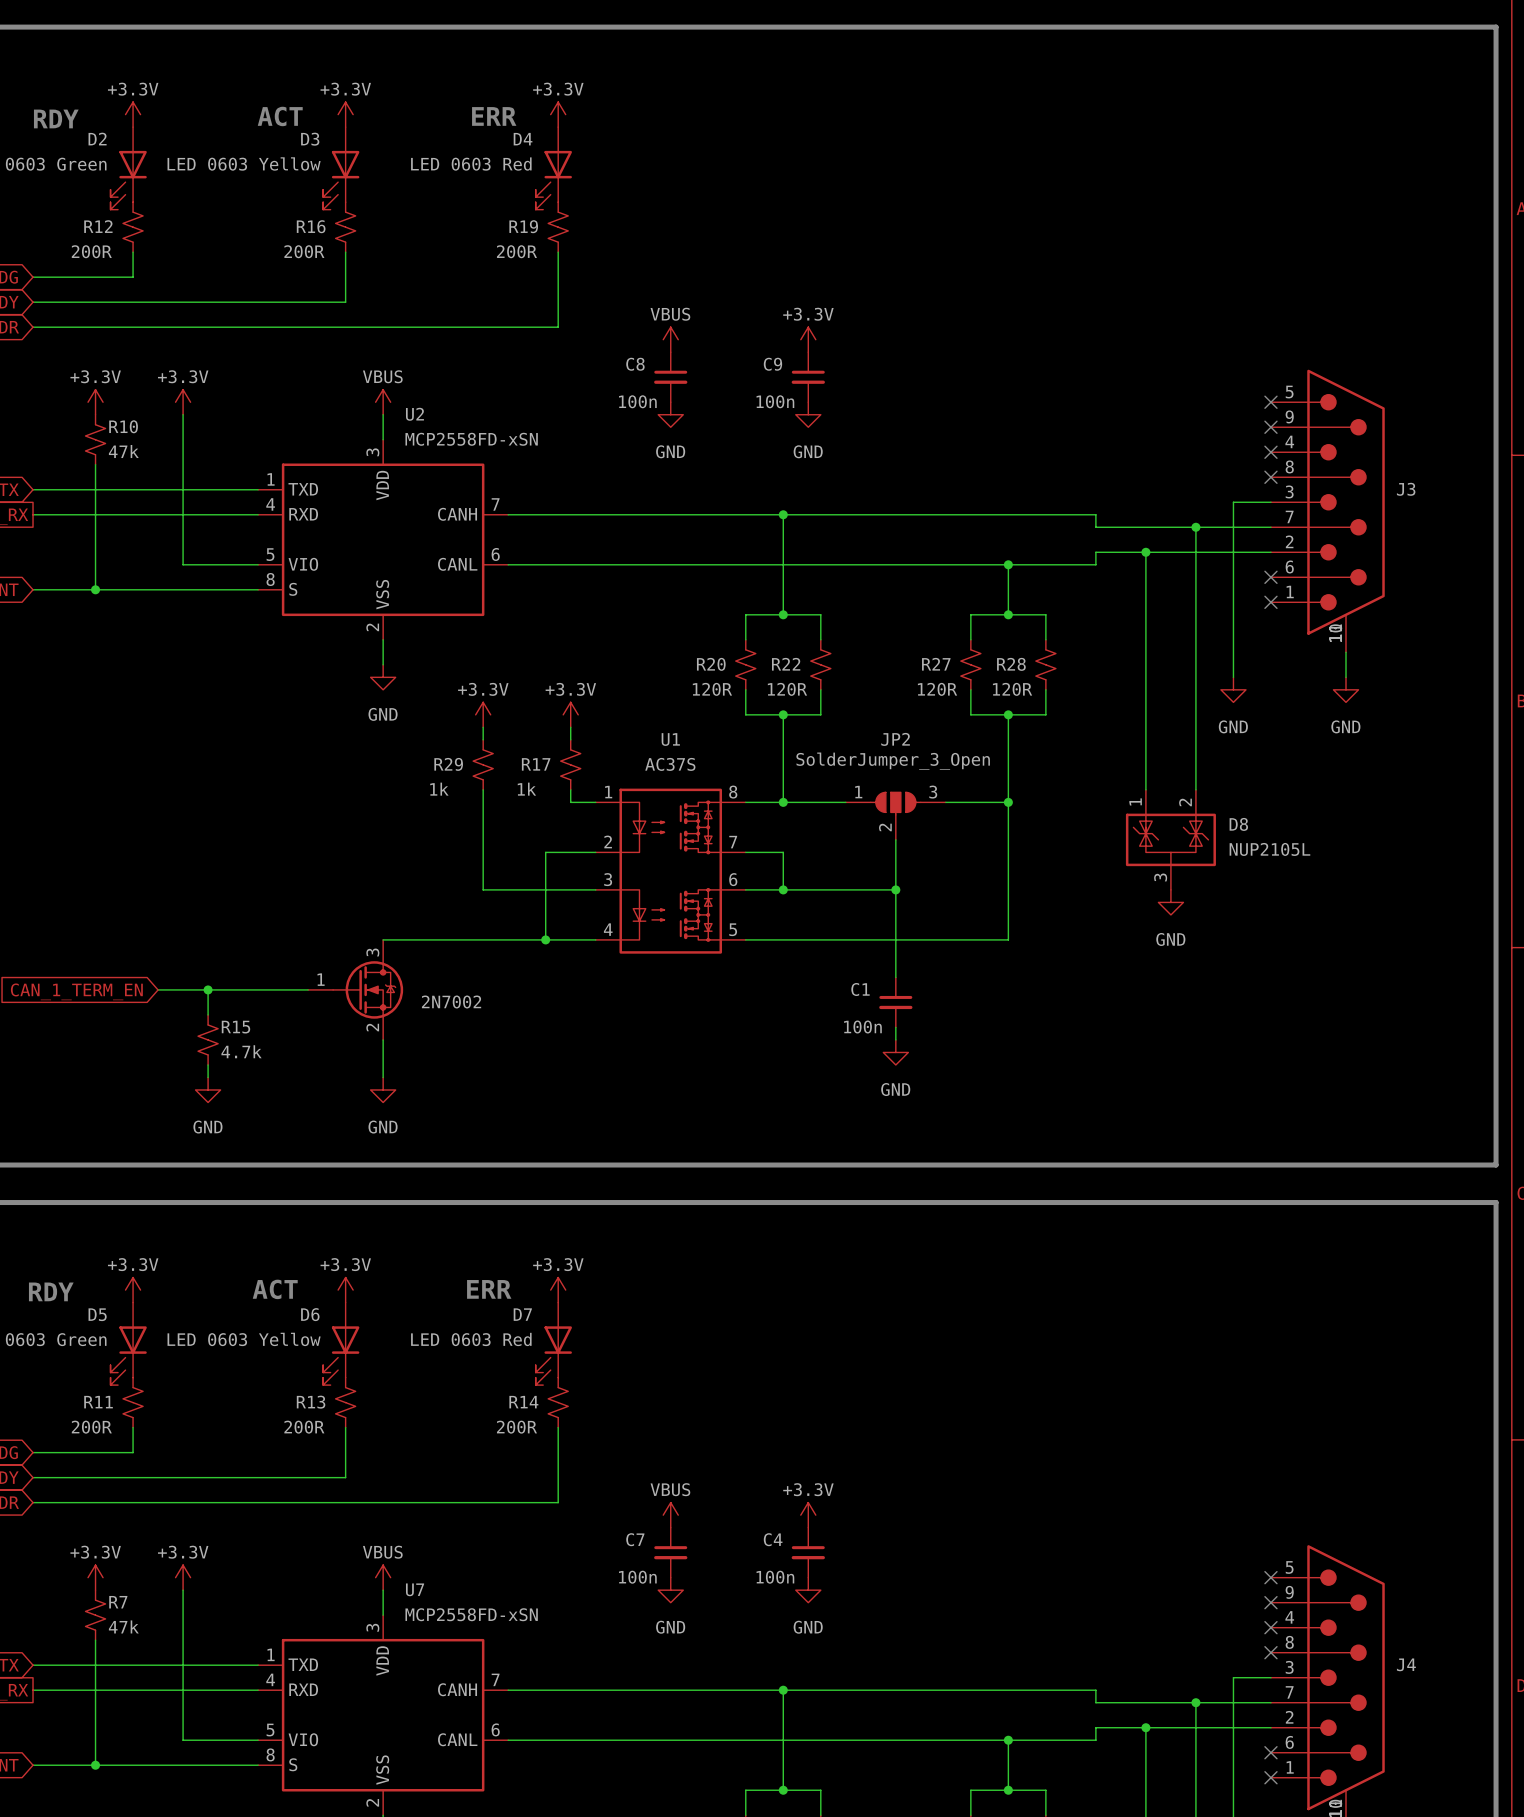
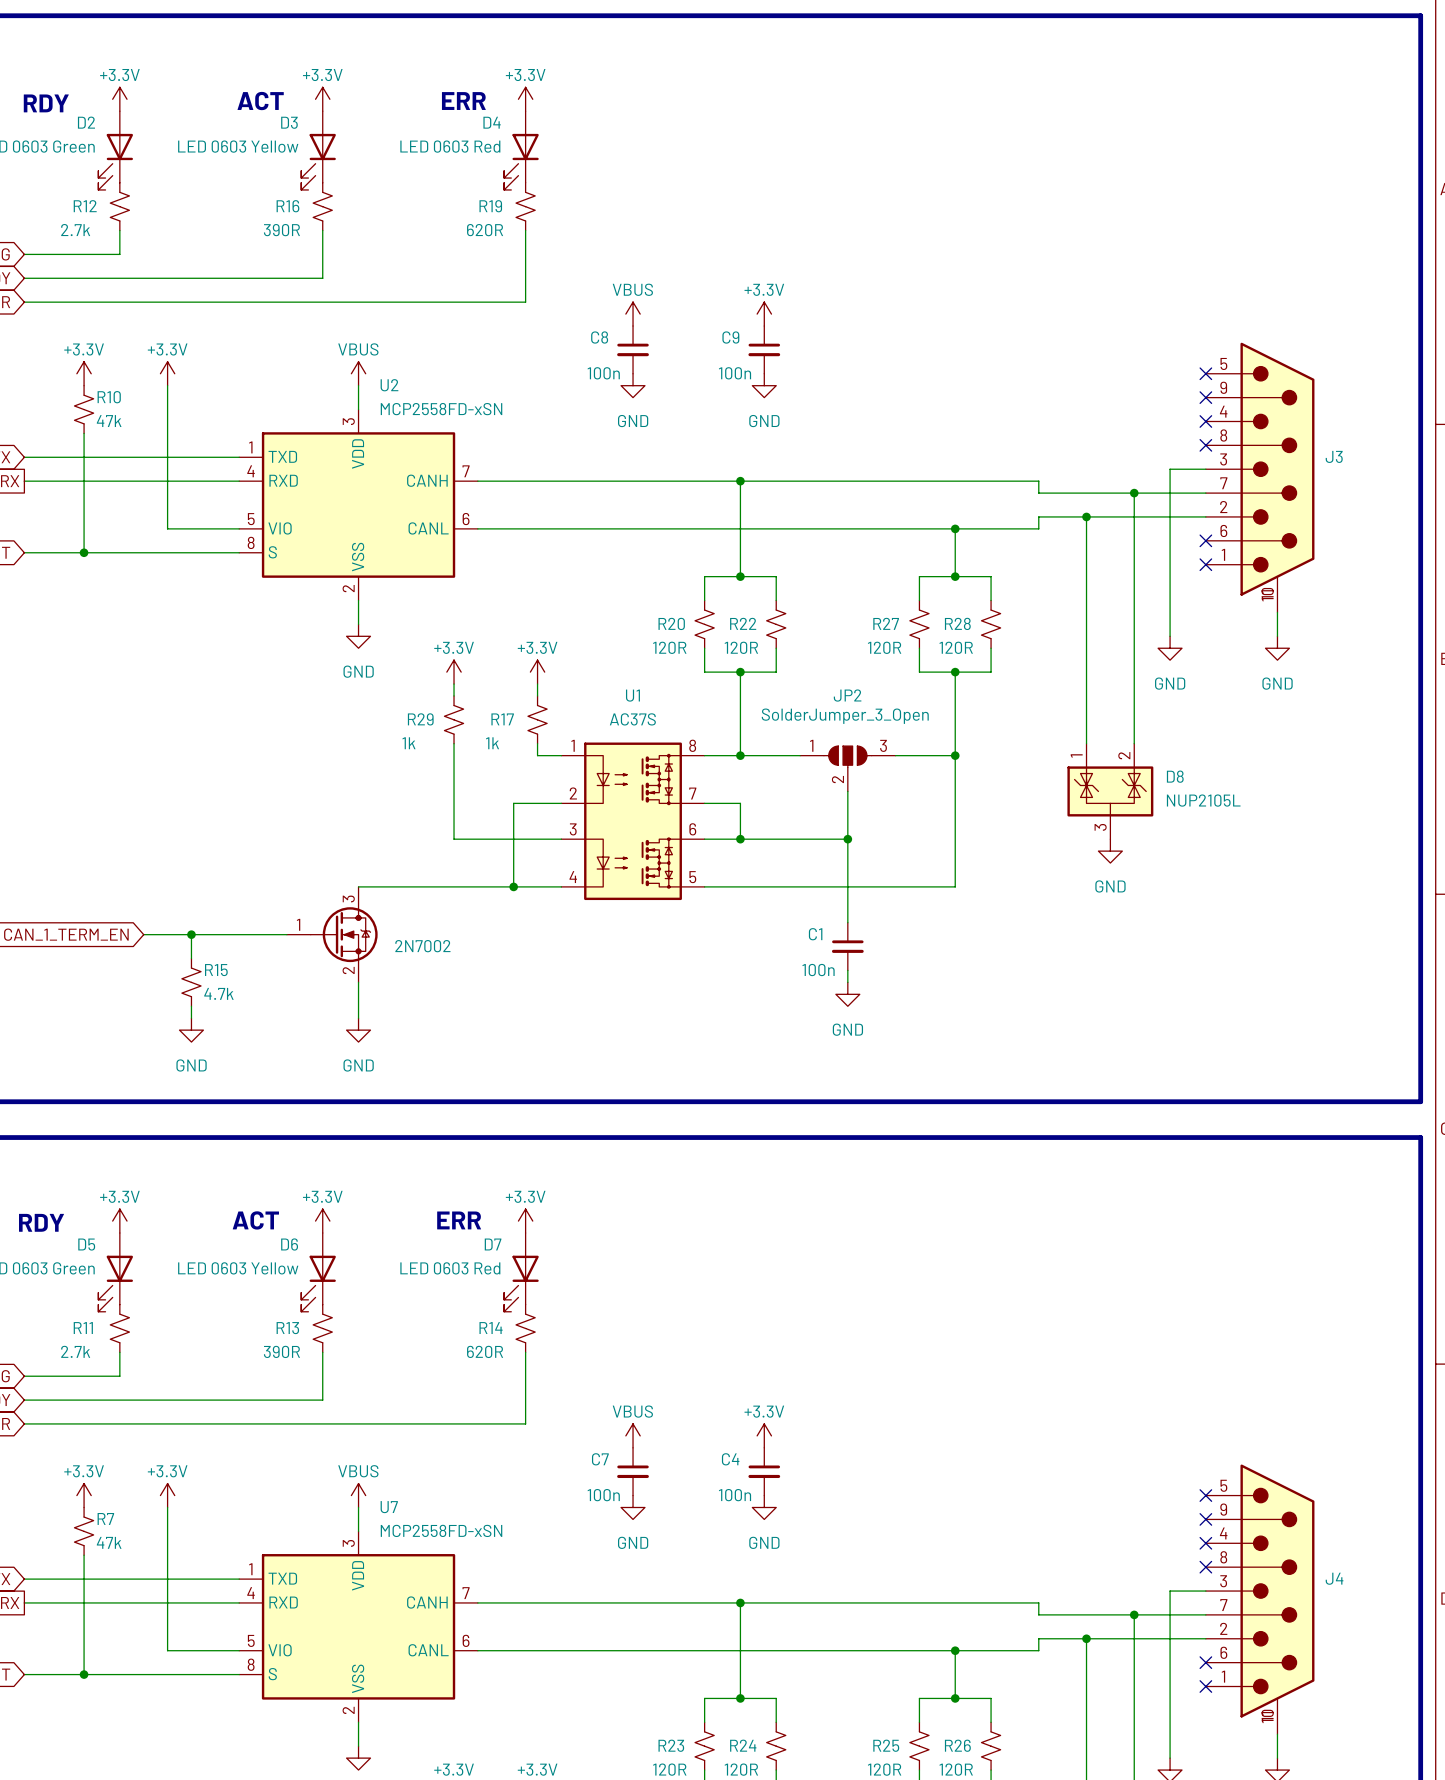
R12 value: 200R (91, 251) -> 2.7k (75, 230)
R16 value: 200R (304, 251) -> 390R (281, 230)
R19 value: 200R (516, 251) -> 620R (485, 230)
R11 value: 200R (91, 1427) -> 2.7k (75, 1351)
R13 value: 200R (304, 1427) -> 390R (281, 1351)
R14 value: 200R (516, 1427) -> 620R (485, 1351)

